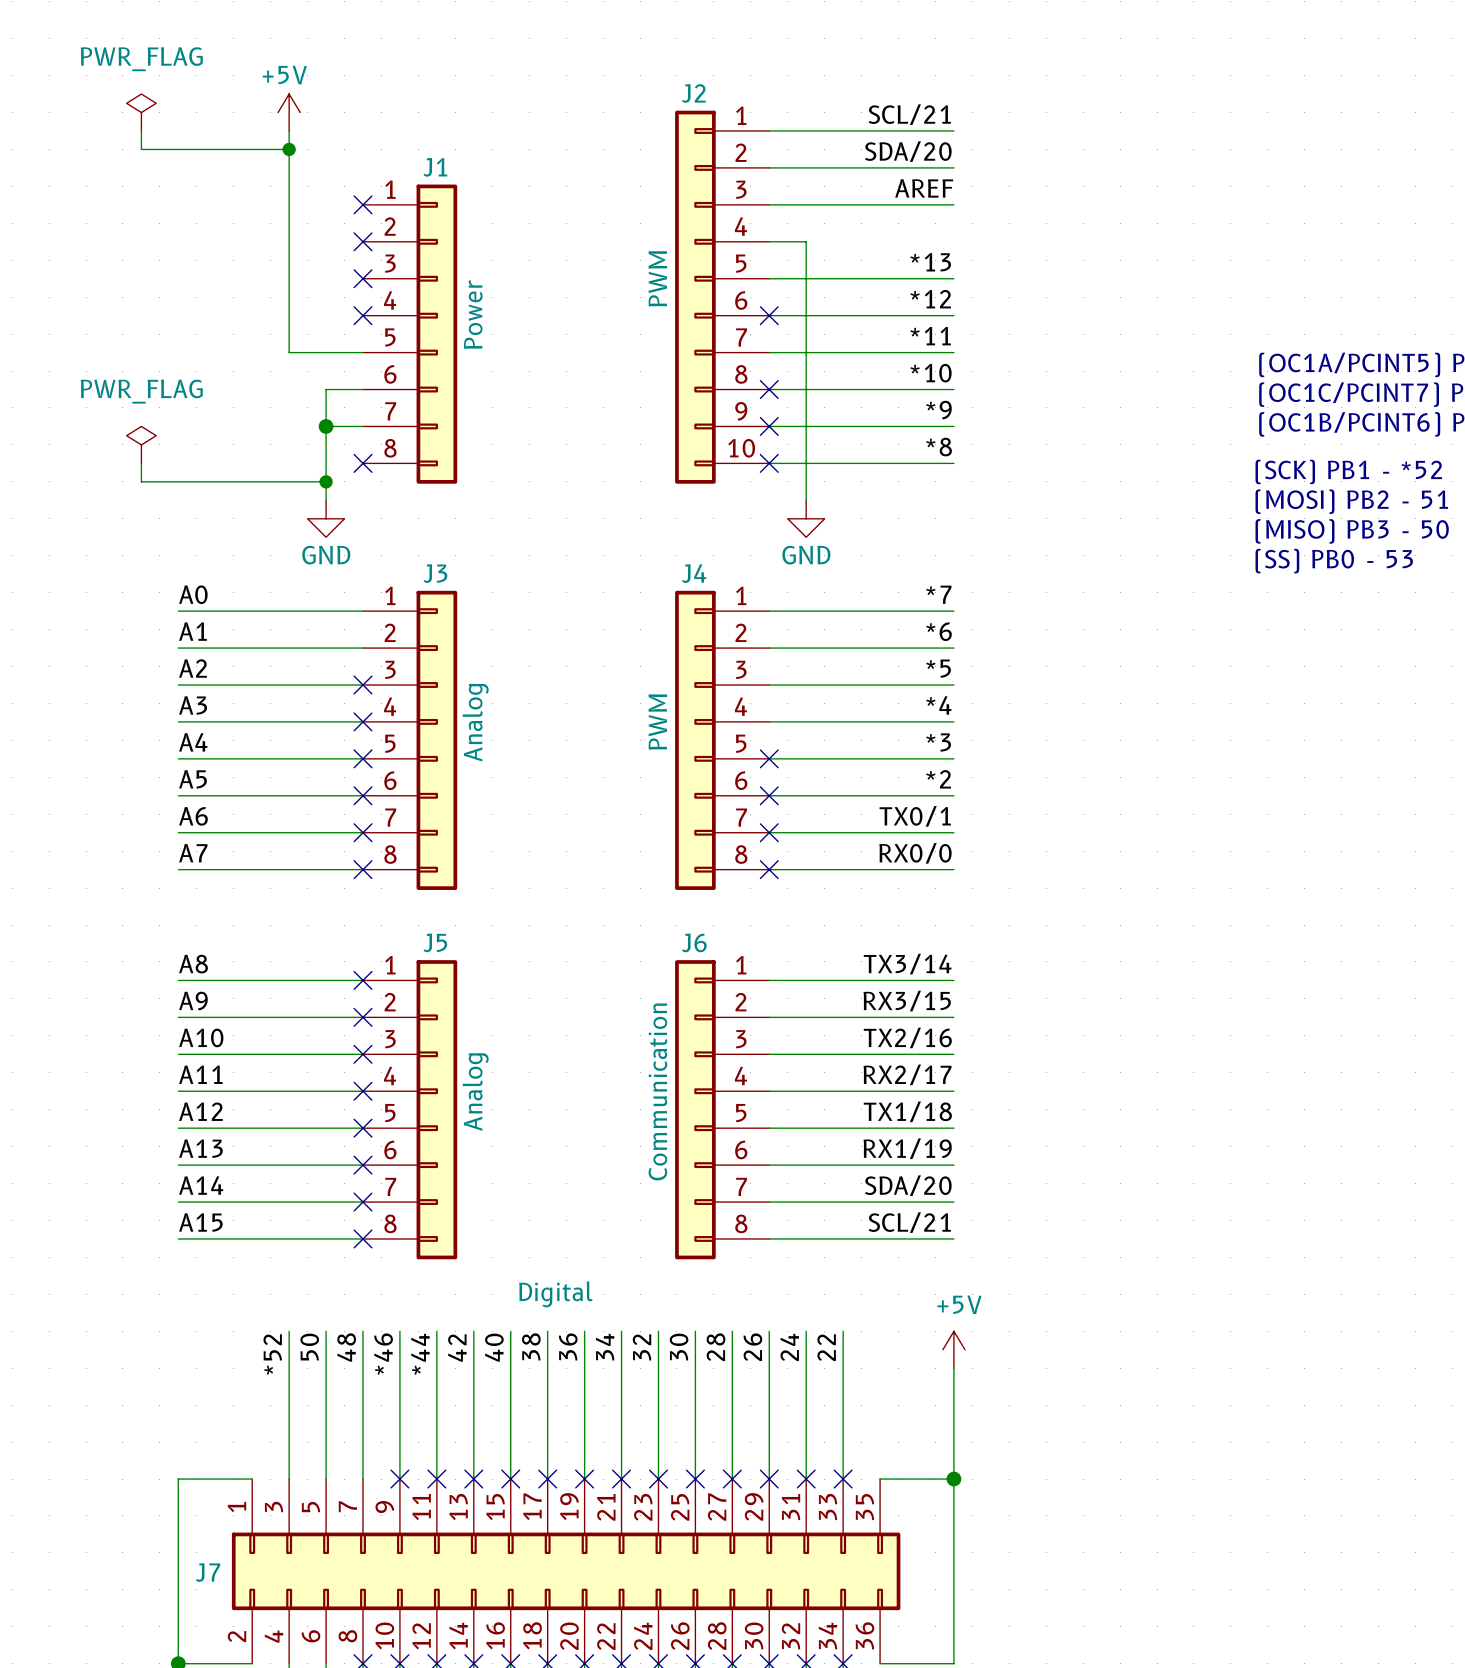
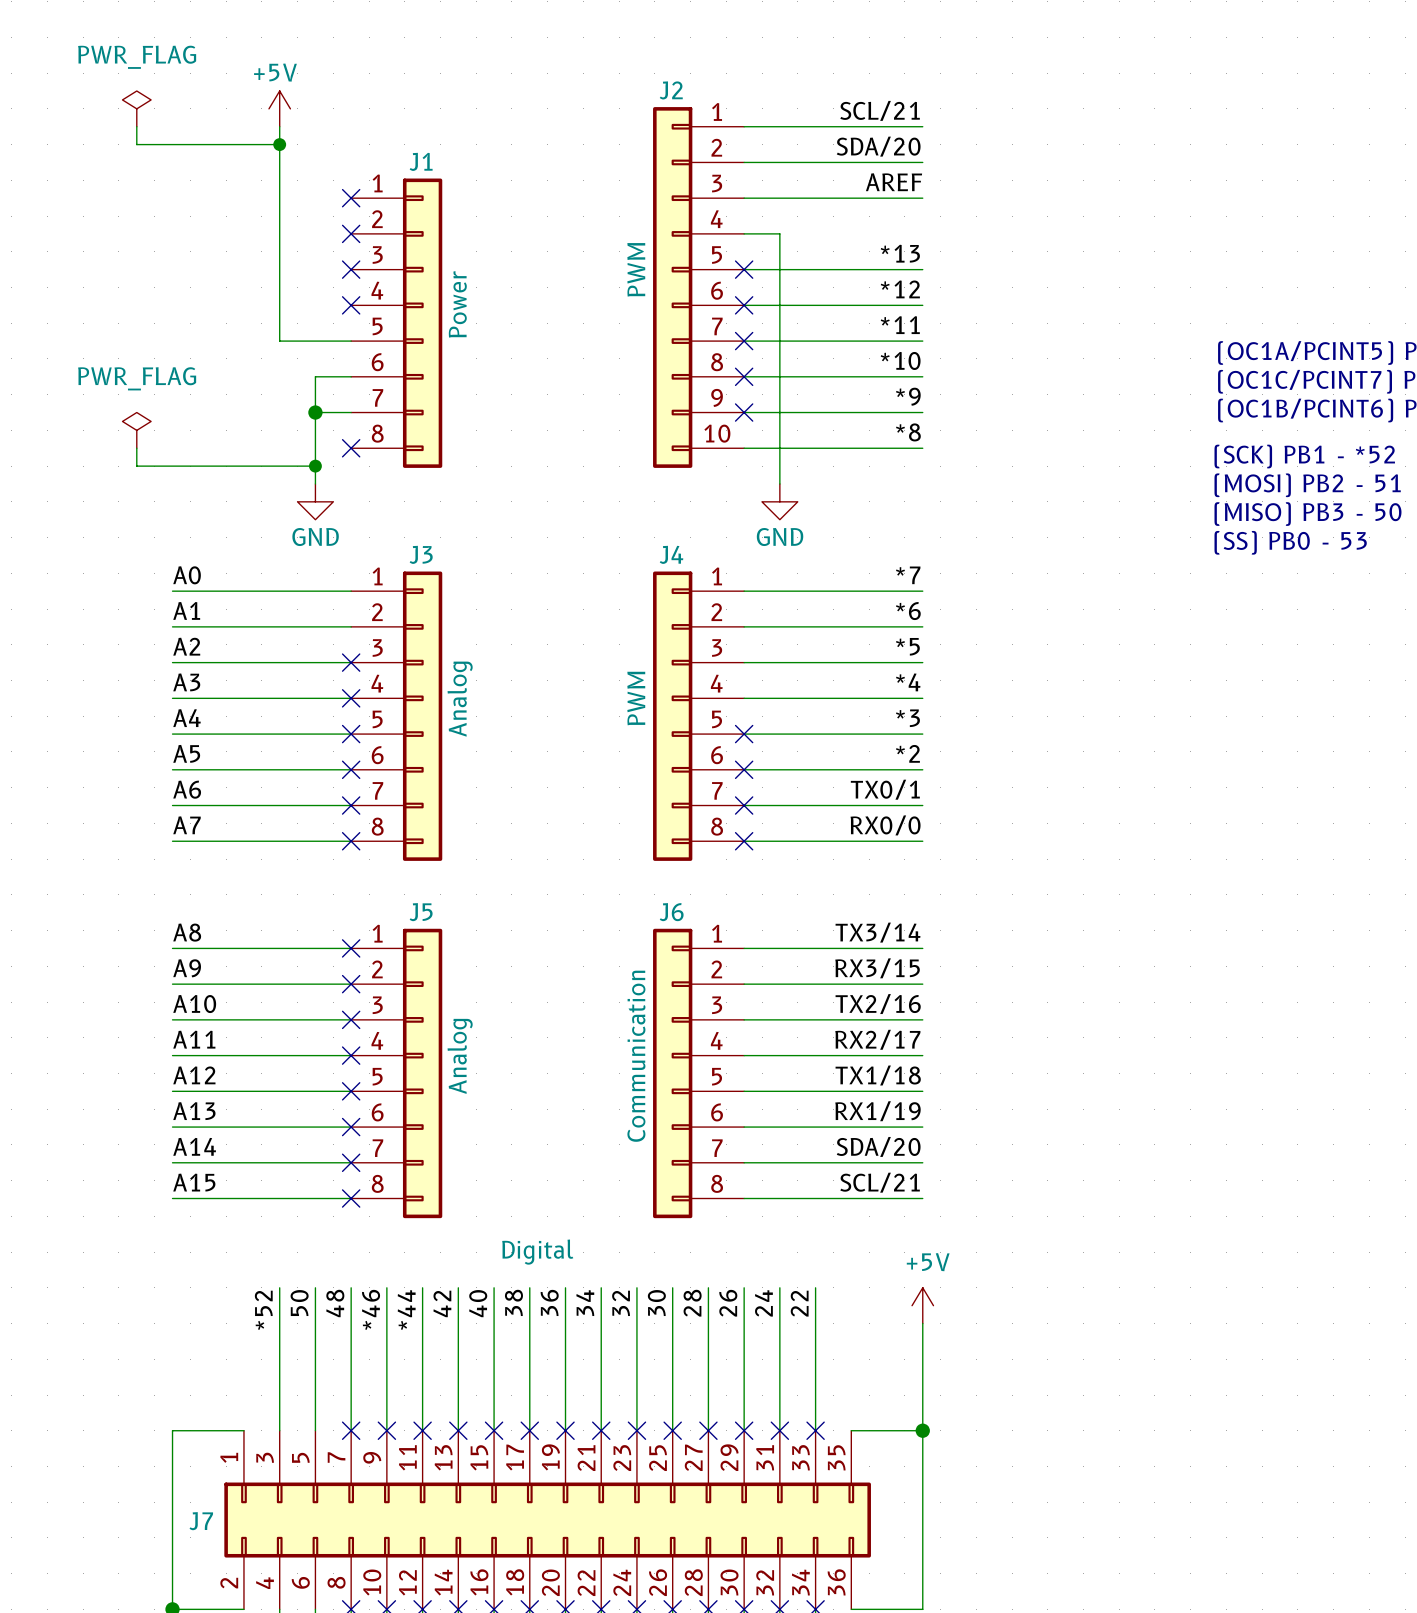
no-connect mark: none -> (744, 269)
no-connect mark: none -> (744, 341)
no-connect mark: (769, 463) -> none
no-connect mark: none -> (351, 1430)

